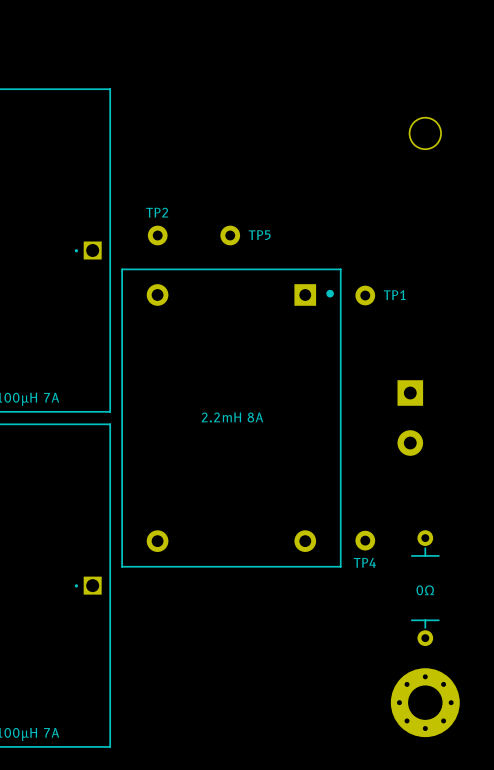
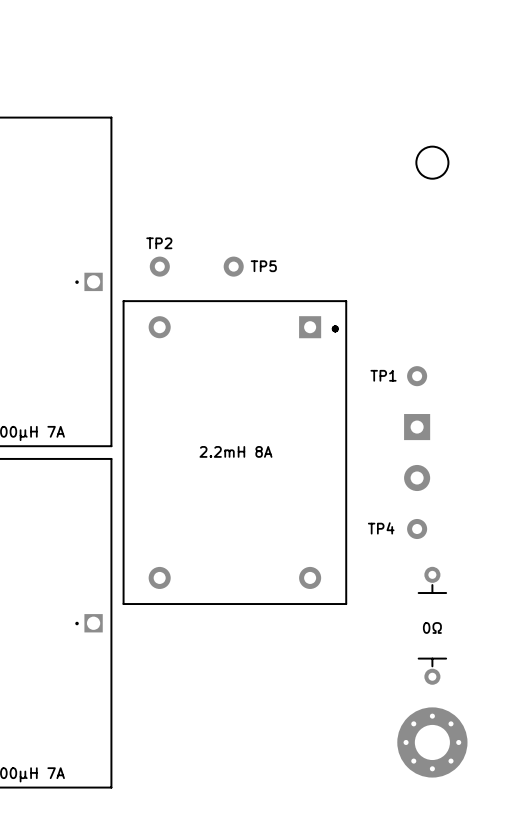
TP1 position: (365, 295) -> (417, 376)
TP1 name position: TP1 (394, 295) -> TP1 (383, 375)
TP4 position: (365, 540) -> (417, 529)
TP4 name position: TP4 (364, 562) -> TP4 (381, 528)

